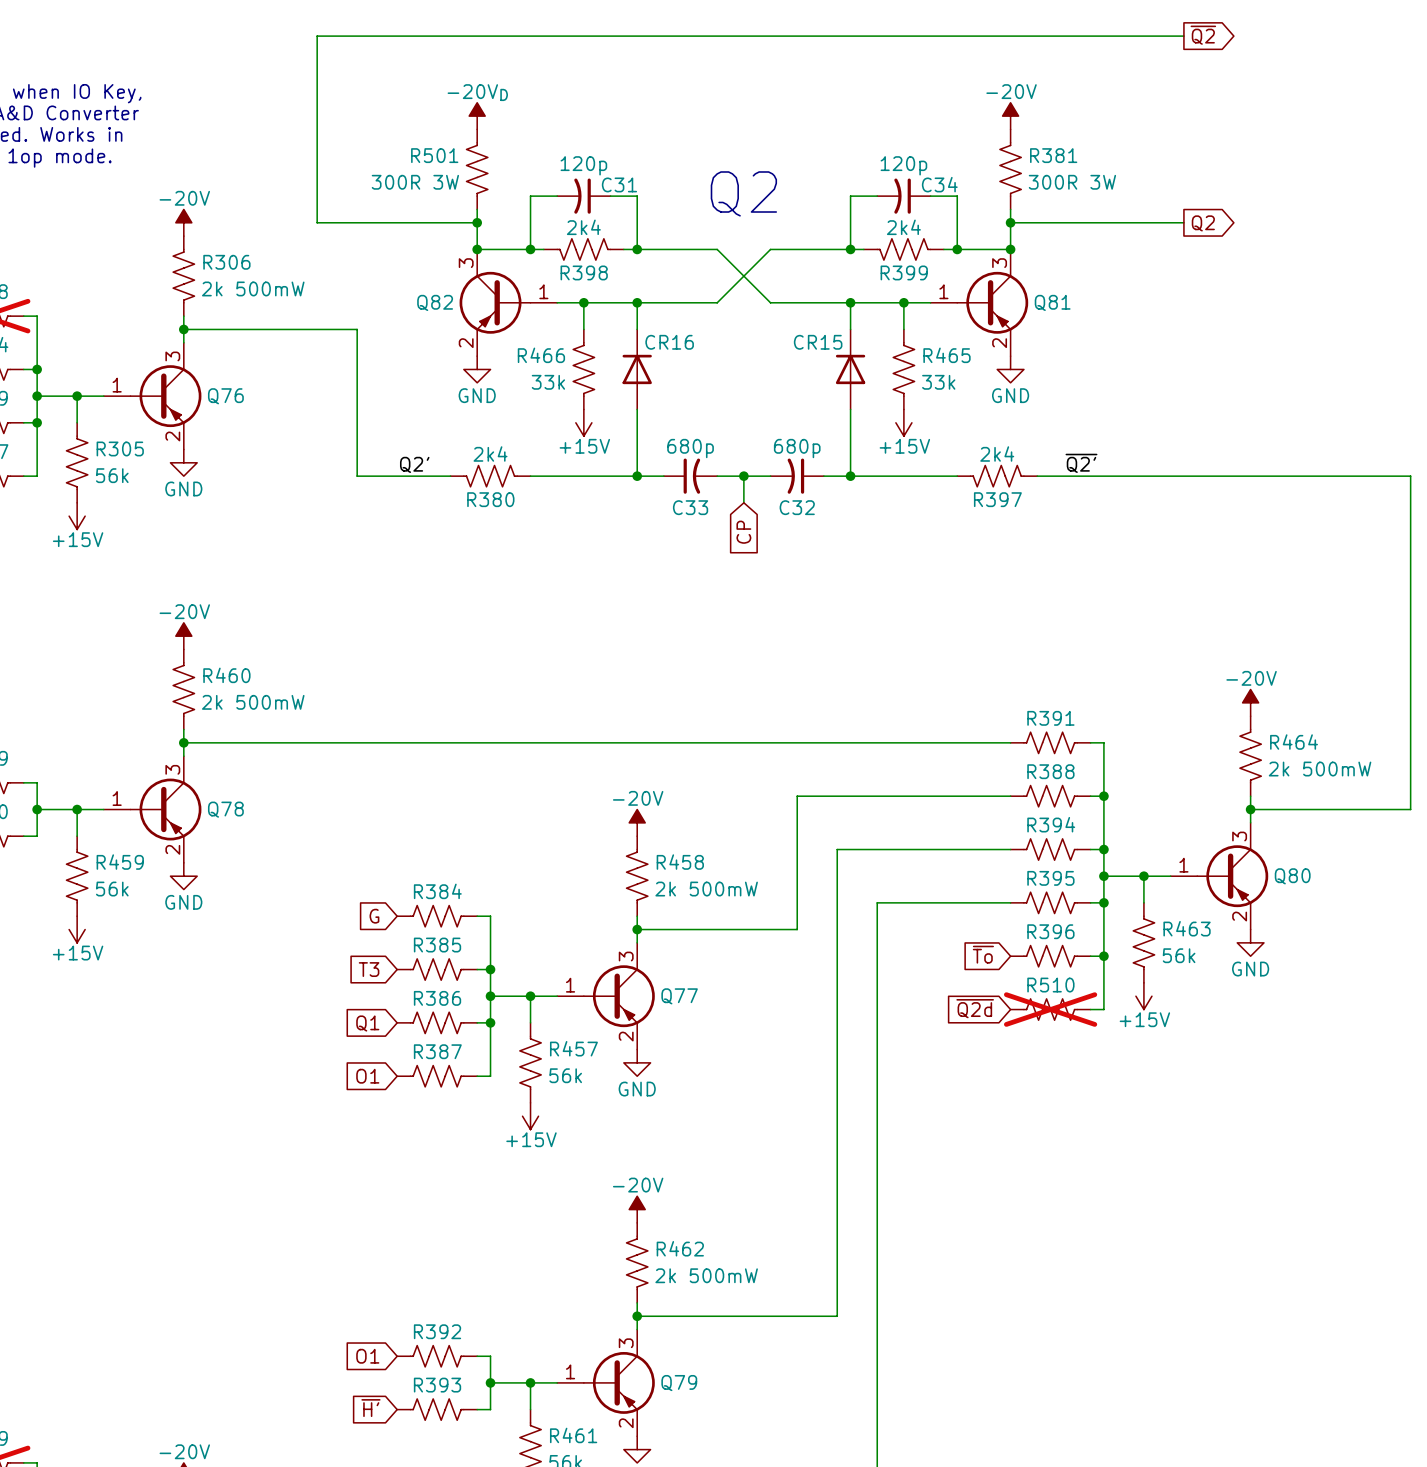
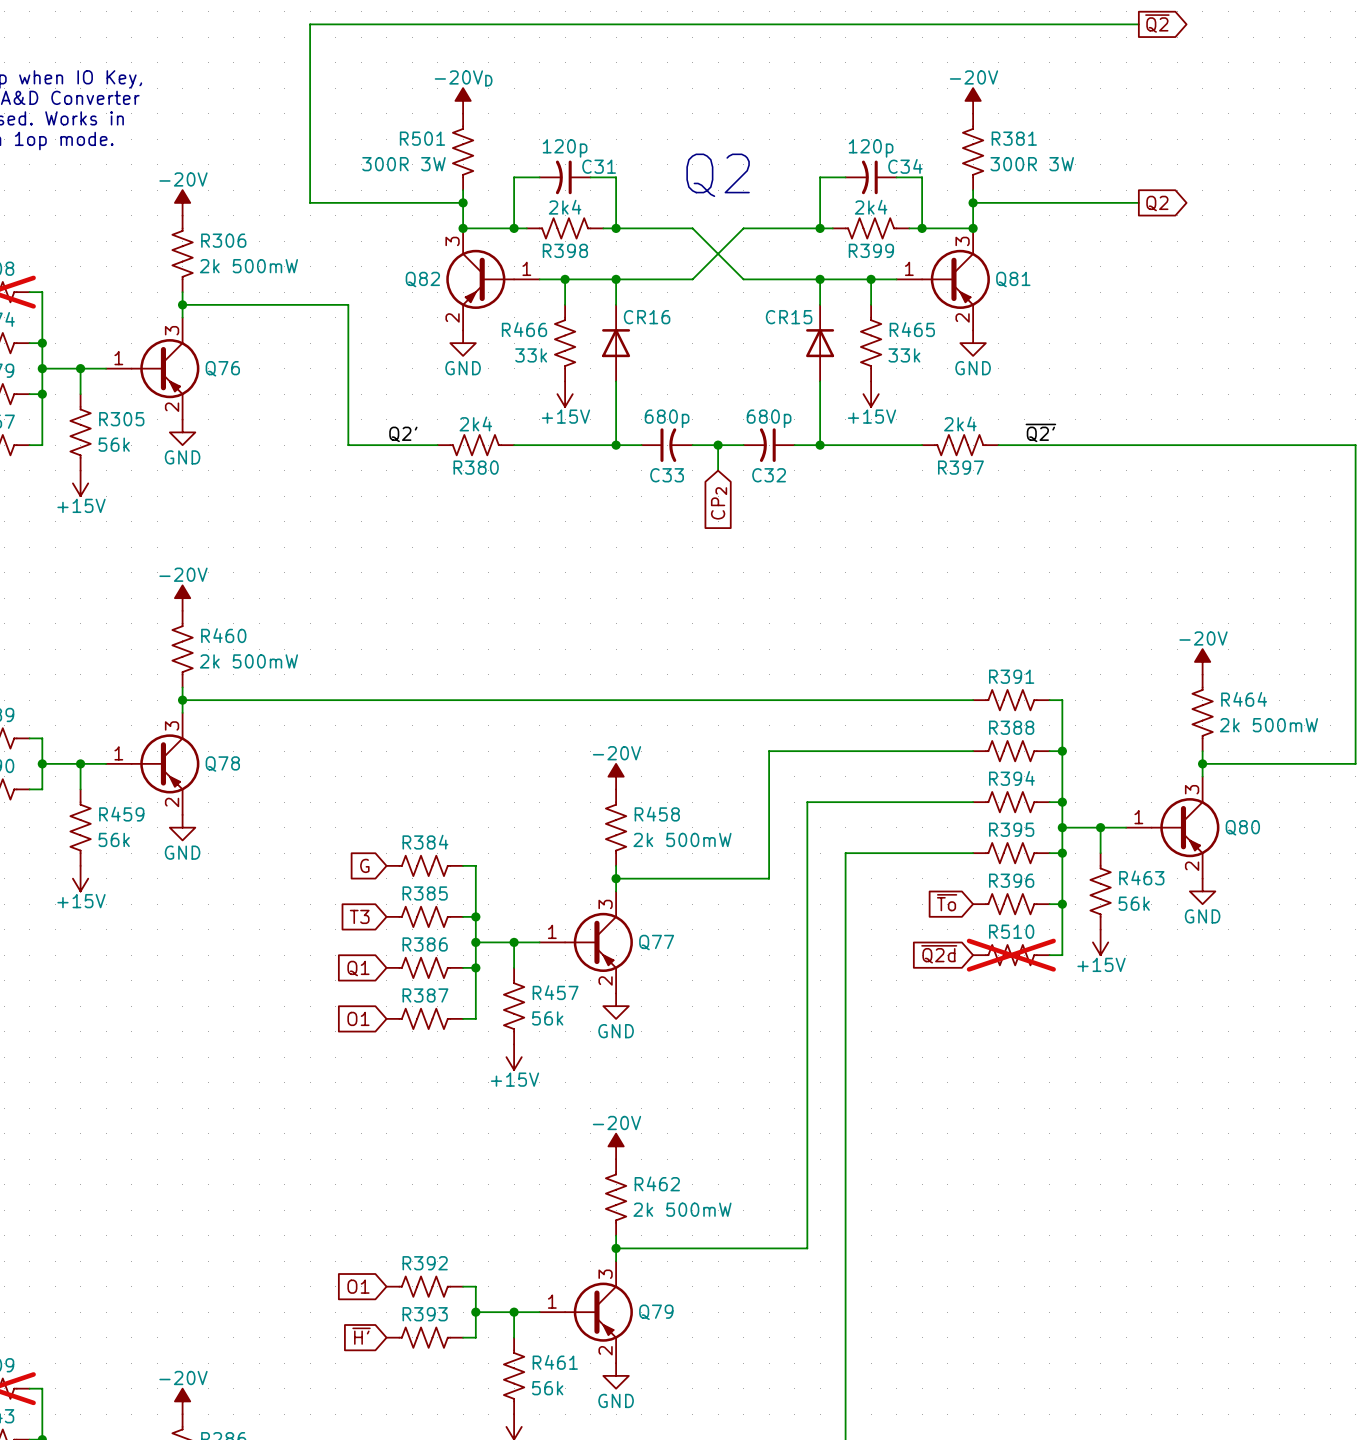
global label: CP (743, 532) -> CP2 (719, 503)

